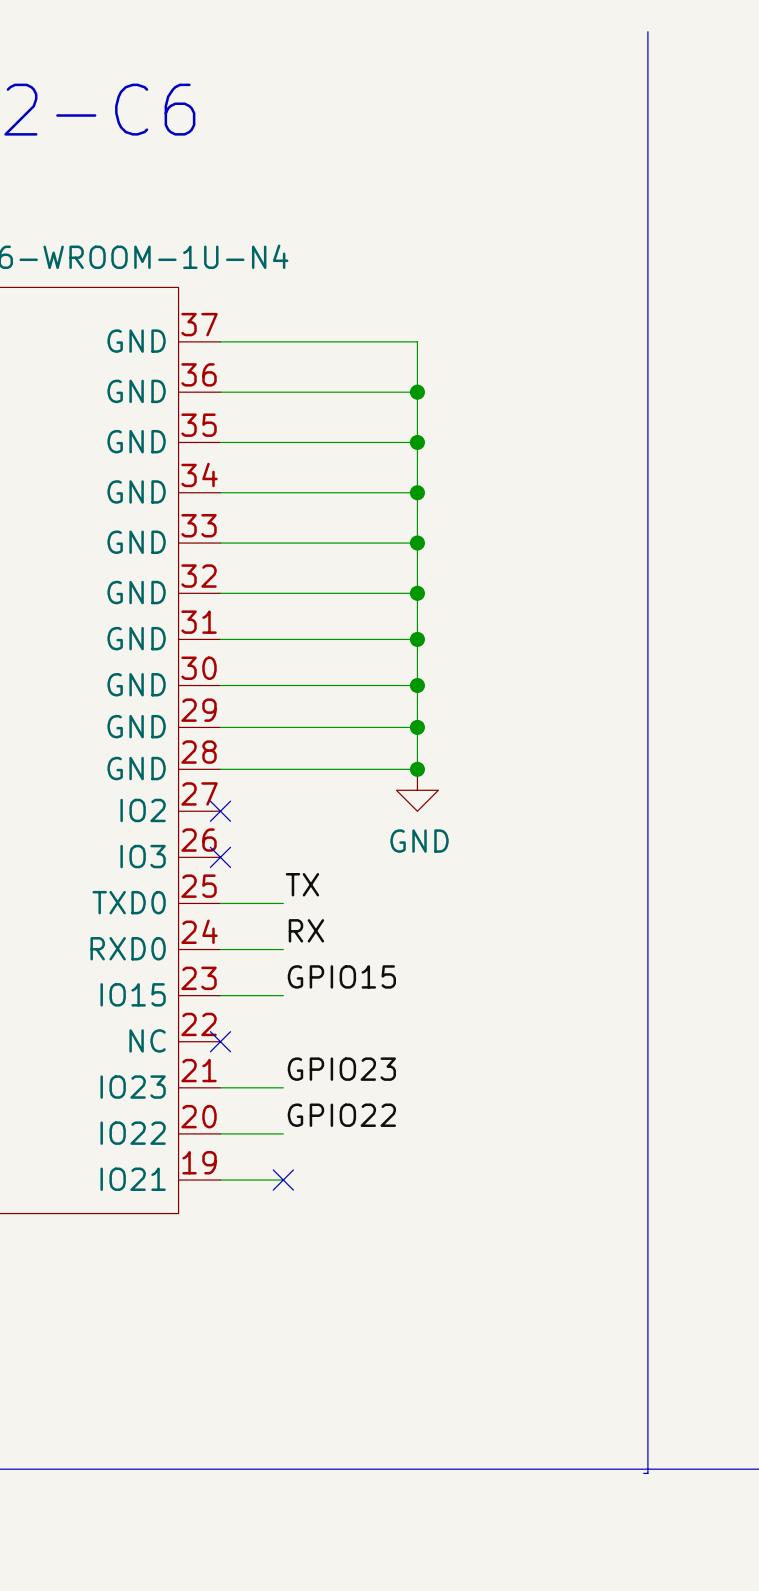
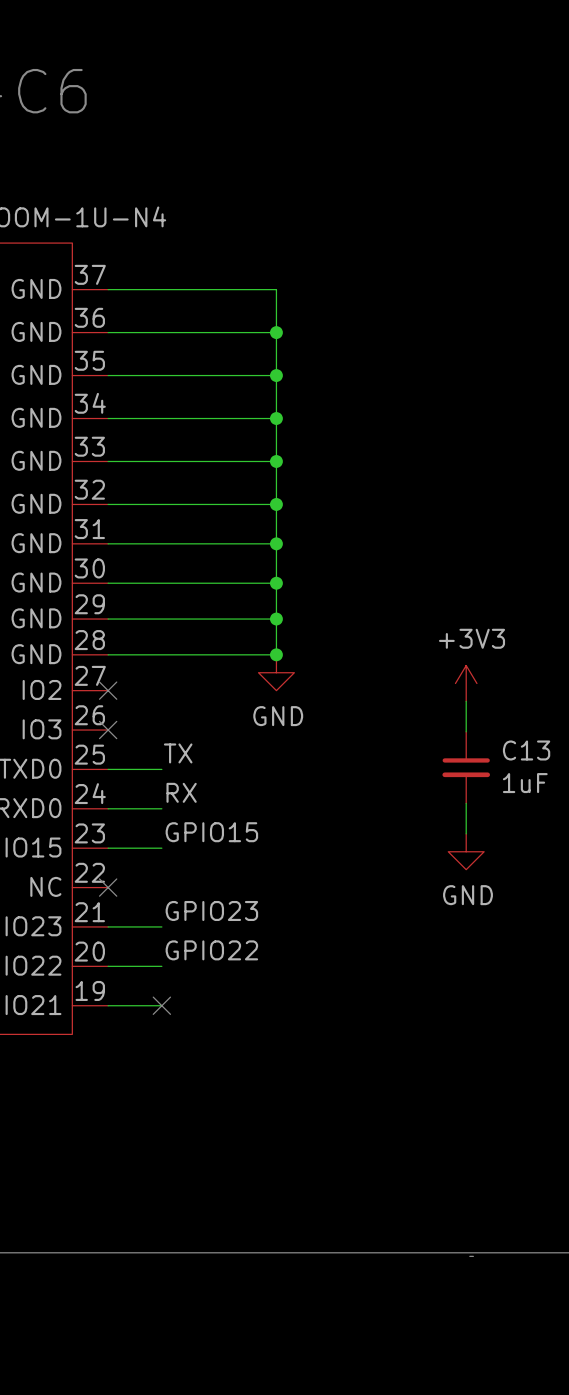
line: (647, 31) (647, 1473) -> none
power symbol: none -> +3V3 (466, 683)
wire: none -> (466, 701) (466, 731)
C13: none -> 1uF (466, 767)
wire: none -> (466, 803) (466, 833)
power symbol: none -> GND (466, 851)

